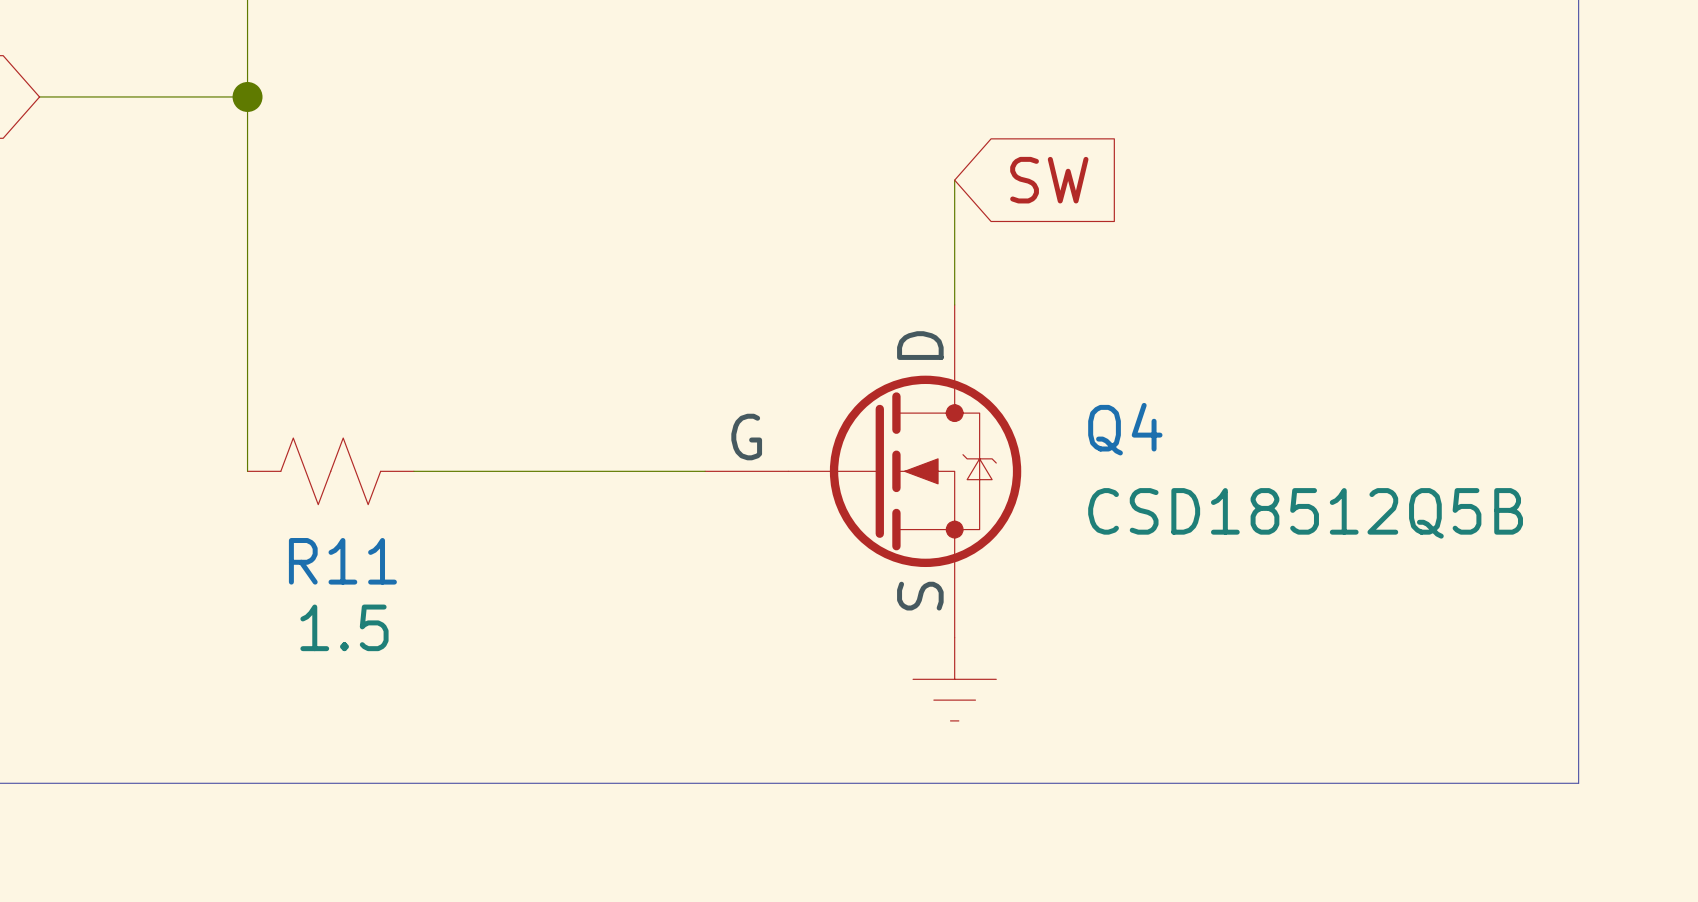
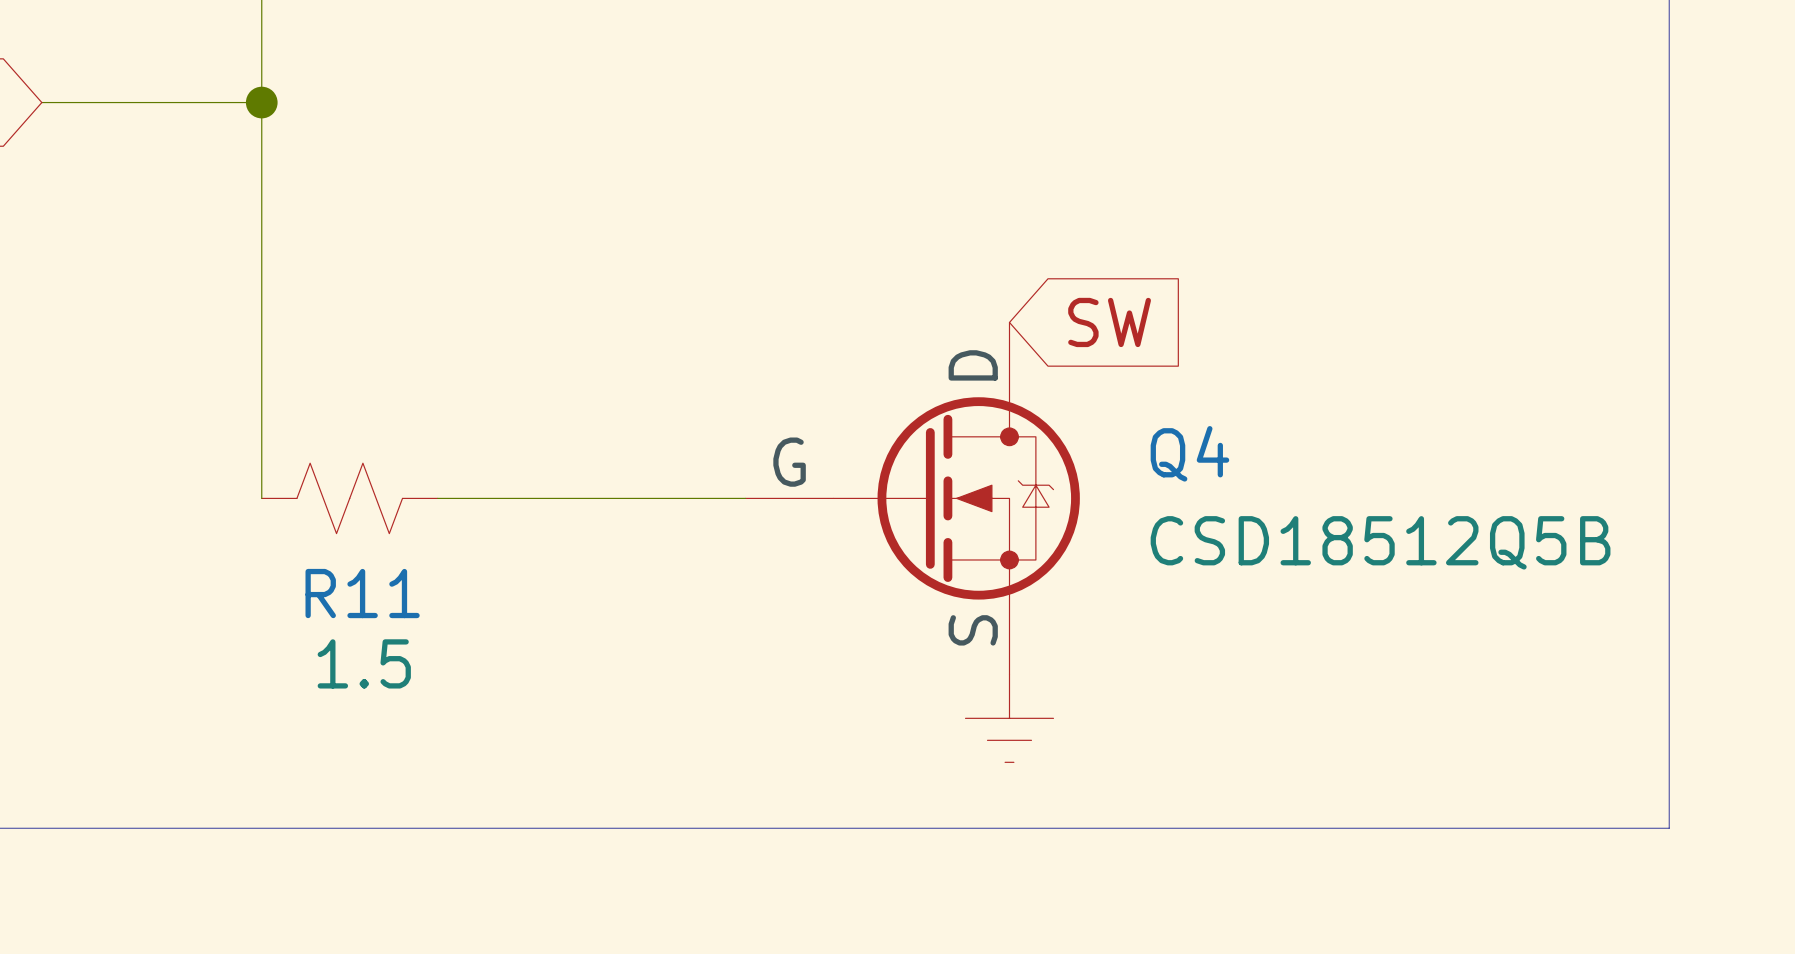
wire: (954, 180) (954, 304) -> none
global label position: SW (1049, 180) -> SW (1109, 322)

